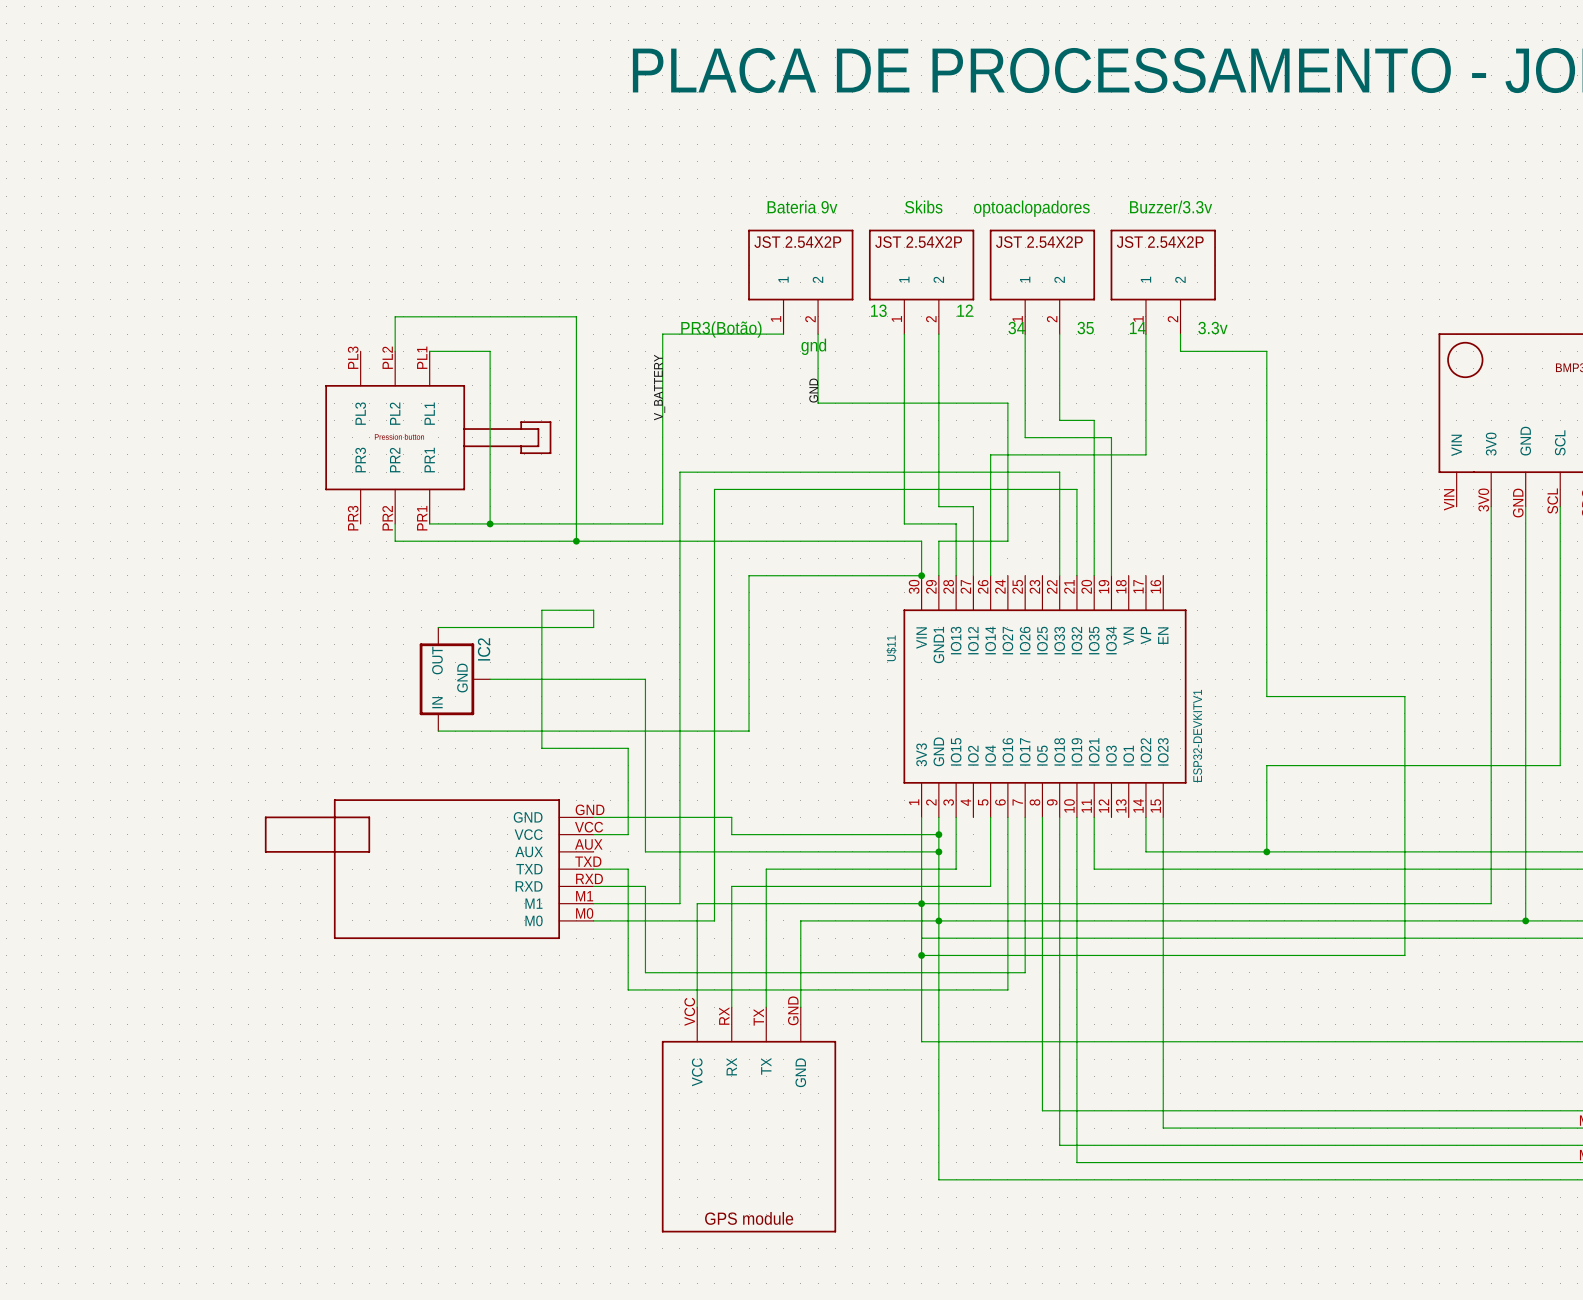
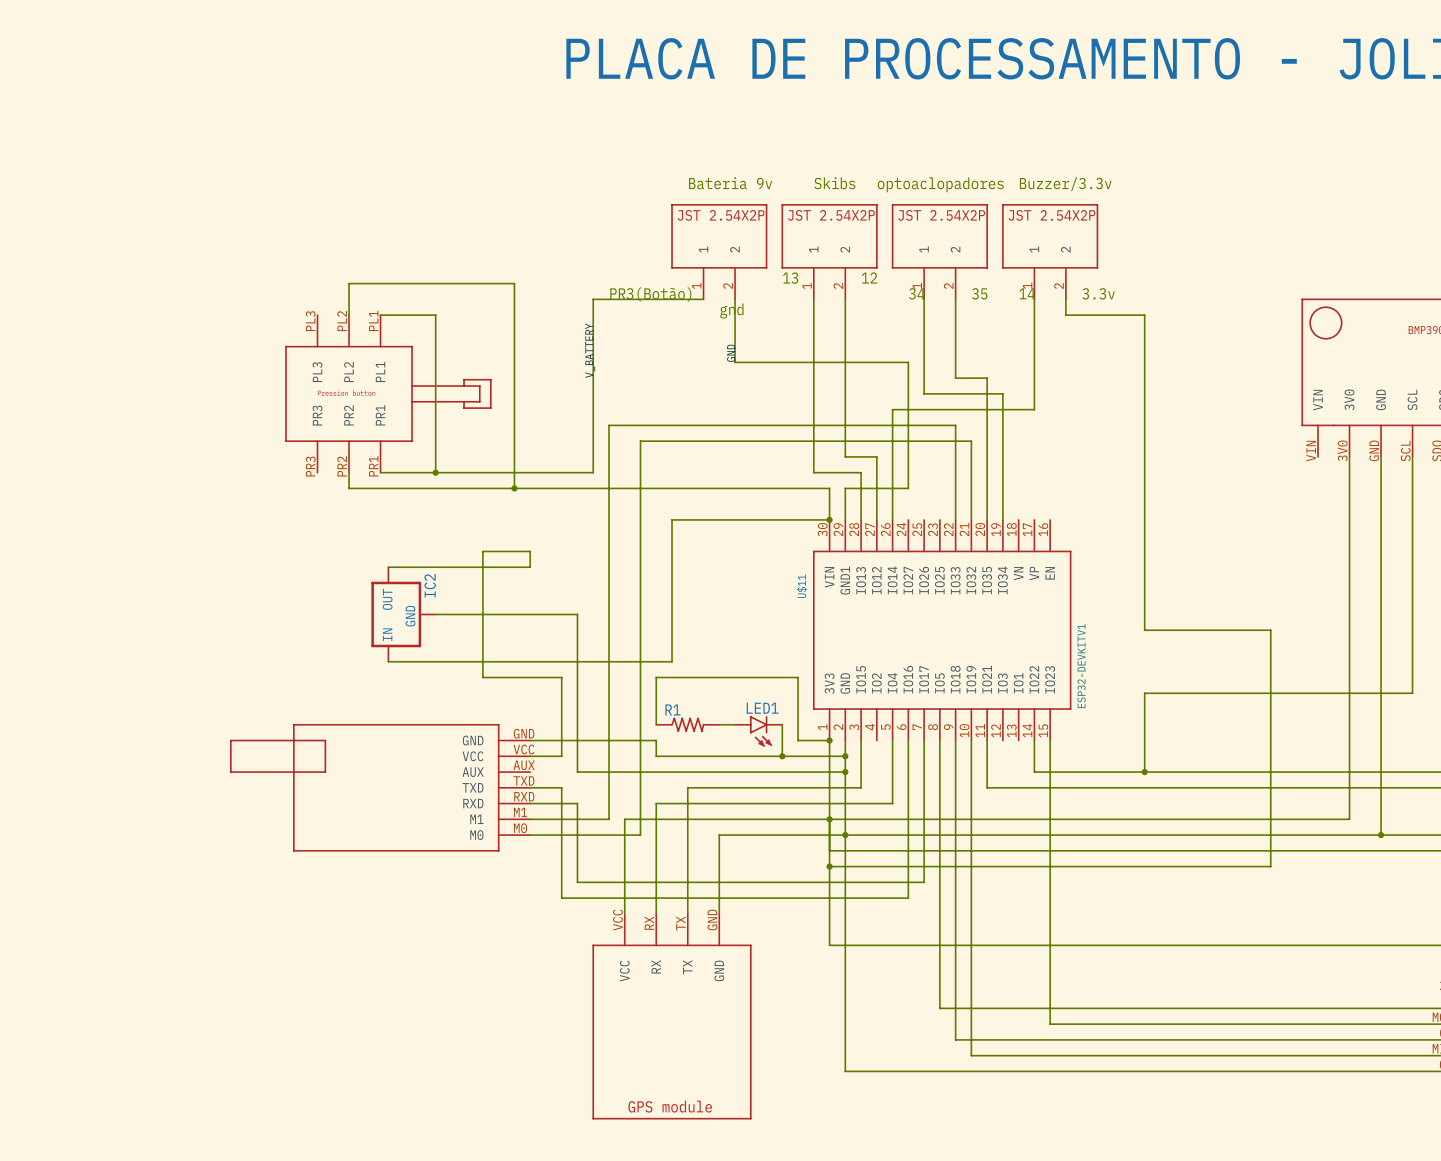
wire: none -> (656, 724) (656, 677) (798, 677) (798, 740) (829, 740)
R1: none -> (687, 724)
wire: none -> (719, 724) (735, 724)
wire: none -> (782, 724) (782, 756)
LED1: none -> (758, 731)
junction: none -> (829, 740)
junction: none -> (782, 756)

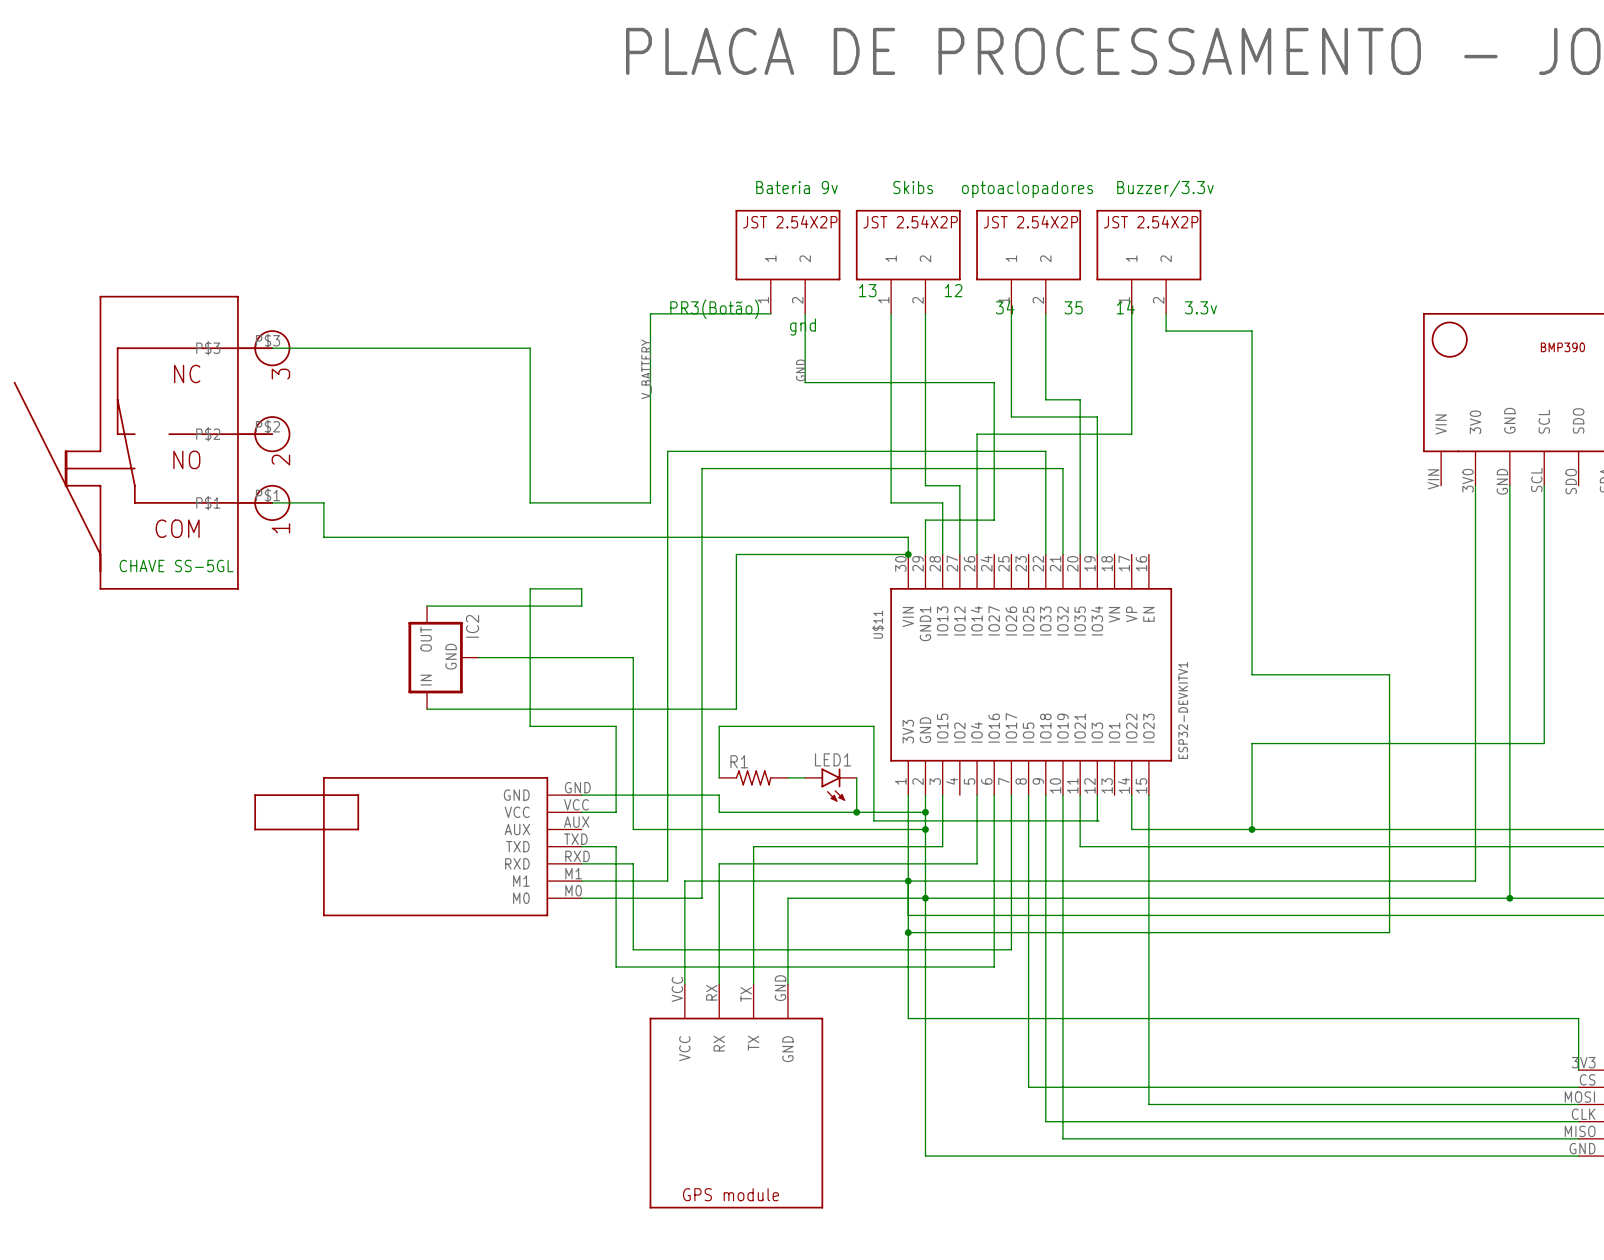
wire: (349, 315) (349, 283) (514, 283) (514, 488) -> none
wire: (380, 315) (435, 315) (435, 472) -> none
part: (388, 393) -> none
part: none -> (152, 442)
wire: (349, 472) (349, 488) (829, 488) (829, 504) -> (272, 502) (323, 502) (323, 537) (908, 537)
wire: (380, 472) (482, 472) -> (272, 348) (530, 348) (530, 502)
junction: (435, 472) -> none
junction: (514, 488) -> none
wire: (798, 740) (829, 740) -> (873, 795) (873, 820) (1099, 820)
junction: (829, 740) -> none
wire: none -> (1097, 795) (1097, 820)

